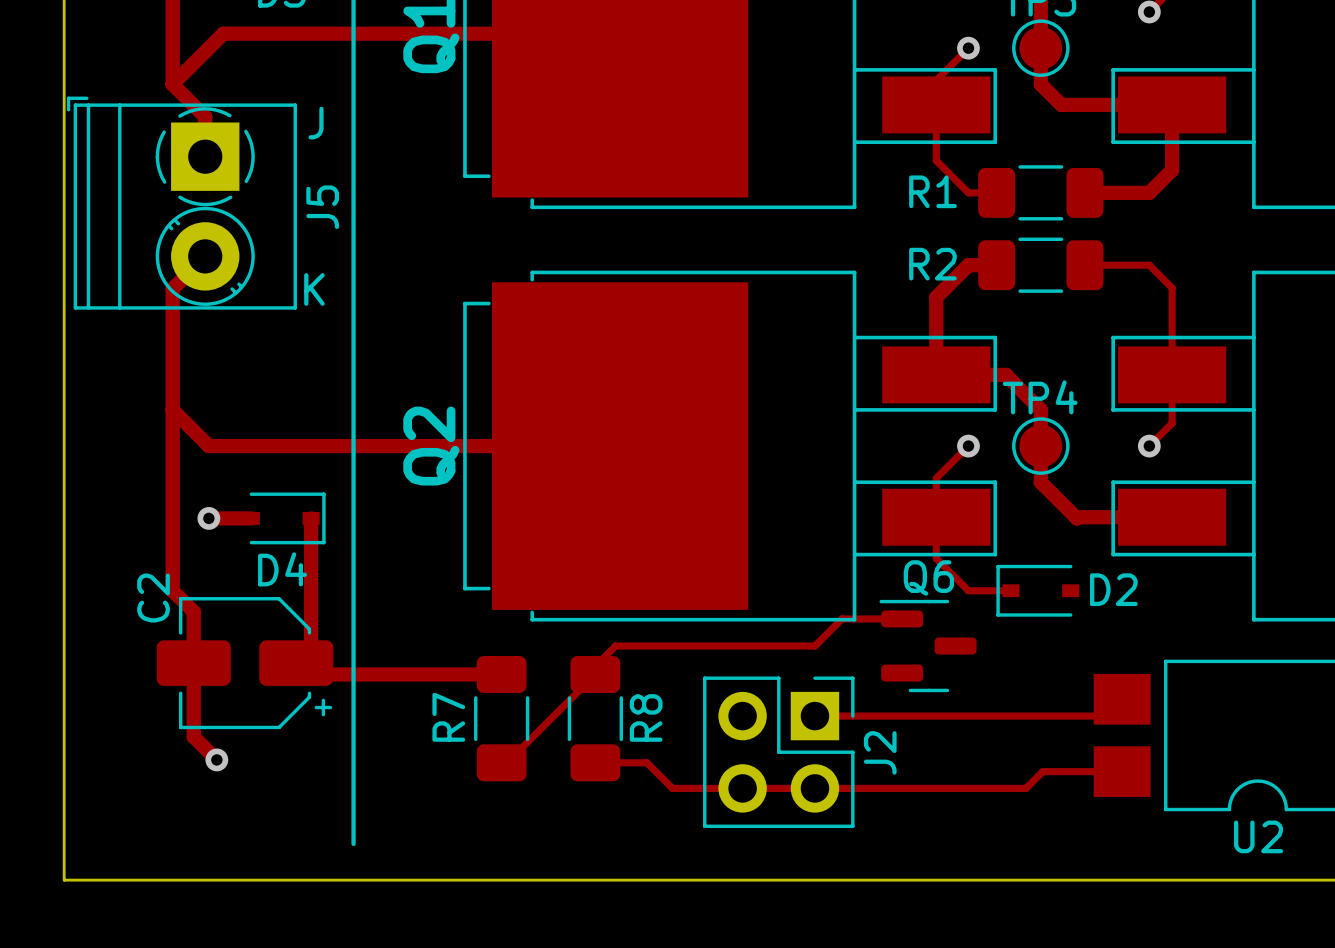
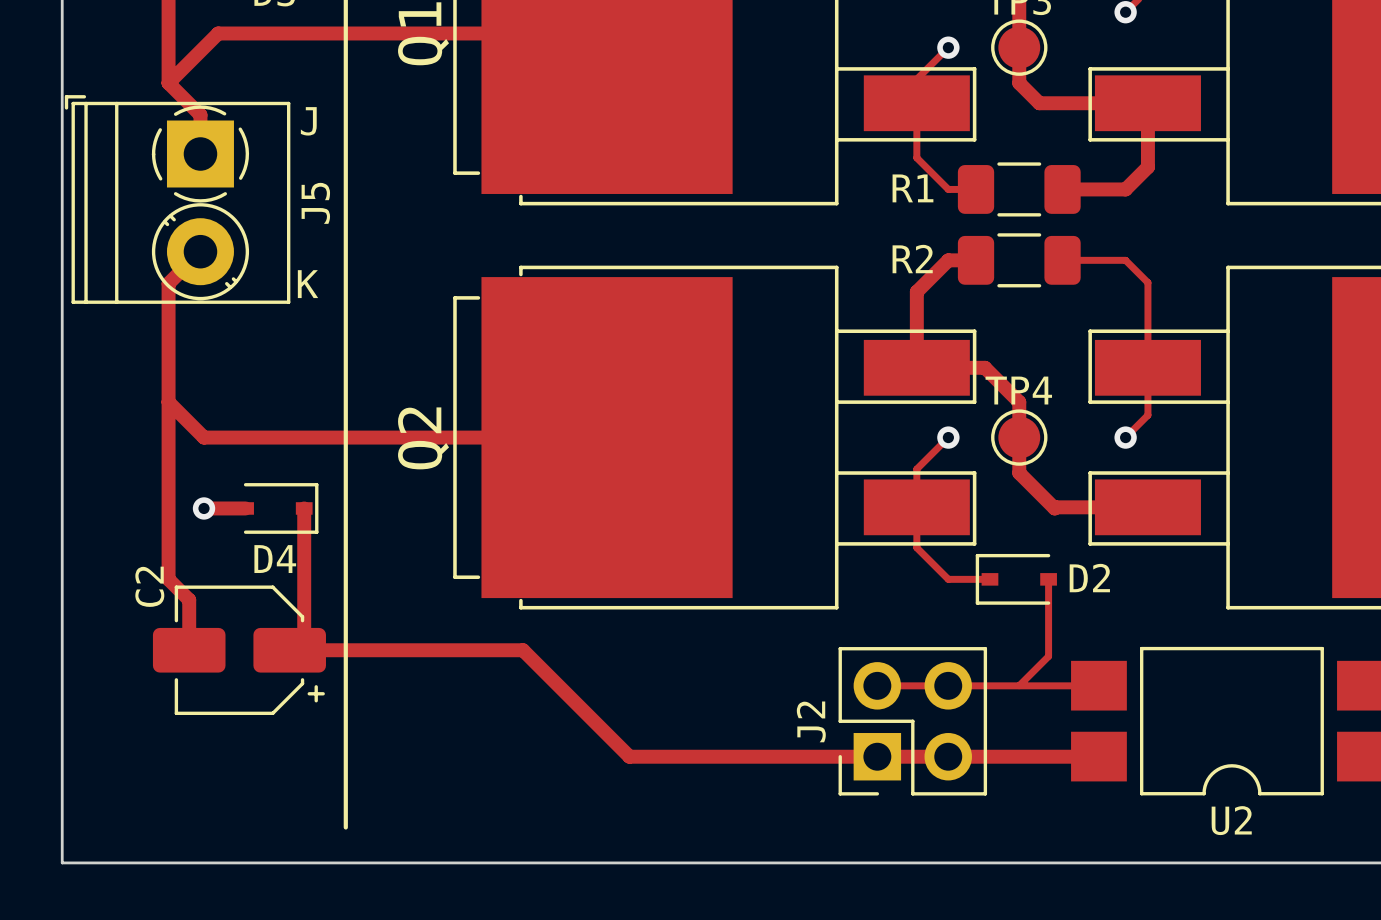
track: none -> (1048, 579) (1048, 656) (1019, 685)
track: (902, 618) (842, 618) (814, 646) (615, 646) (595, 666) (595, 674) (507, 762) (501, 762) -> none
Q6: (928, 646) -> none
track: (193, 663) (193, 736) (216, 759) -> none
track: (296, 663) (307, 674) (501, 674) -> none
track: (1121, 699) (1105, 716) (814, 716) -> (1098, 685) (877, 685)
R7: (501, 718) -> none
R8: (595, 718) -> none
J2 rotation: 0° (778, 752) -> 180° (912, 721)
J2 position: (778, 752) -> (912, 721)
via: (216, 759) -> none
track: (595, 762) (646, 762) (672, 788) (1026, 788) (1042, 771) (1122, 771) -> (289, 650) (523, 650) (629, 756) (1098, 756)

